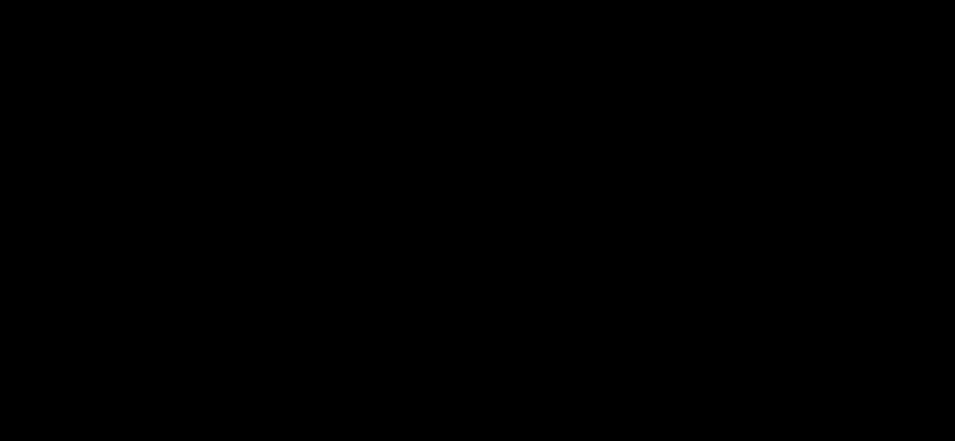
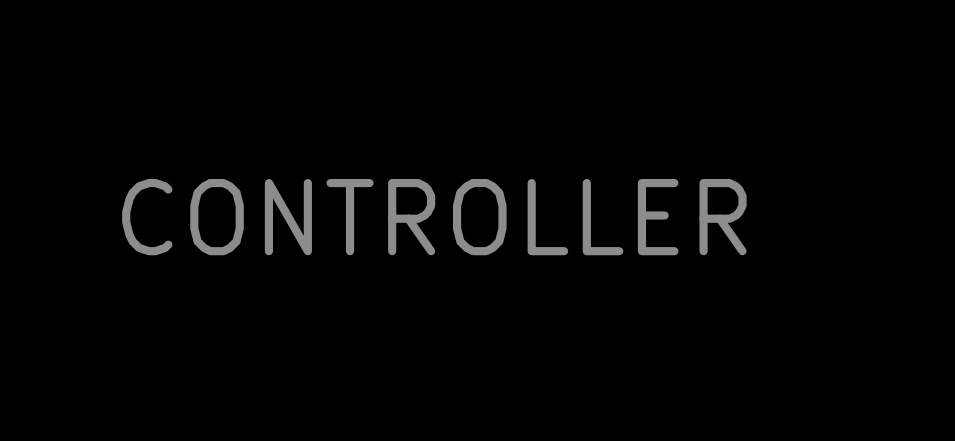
text: none -> CONTROLLER (434, 217)

